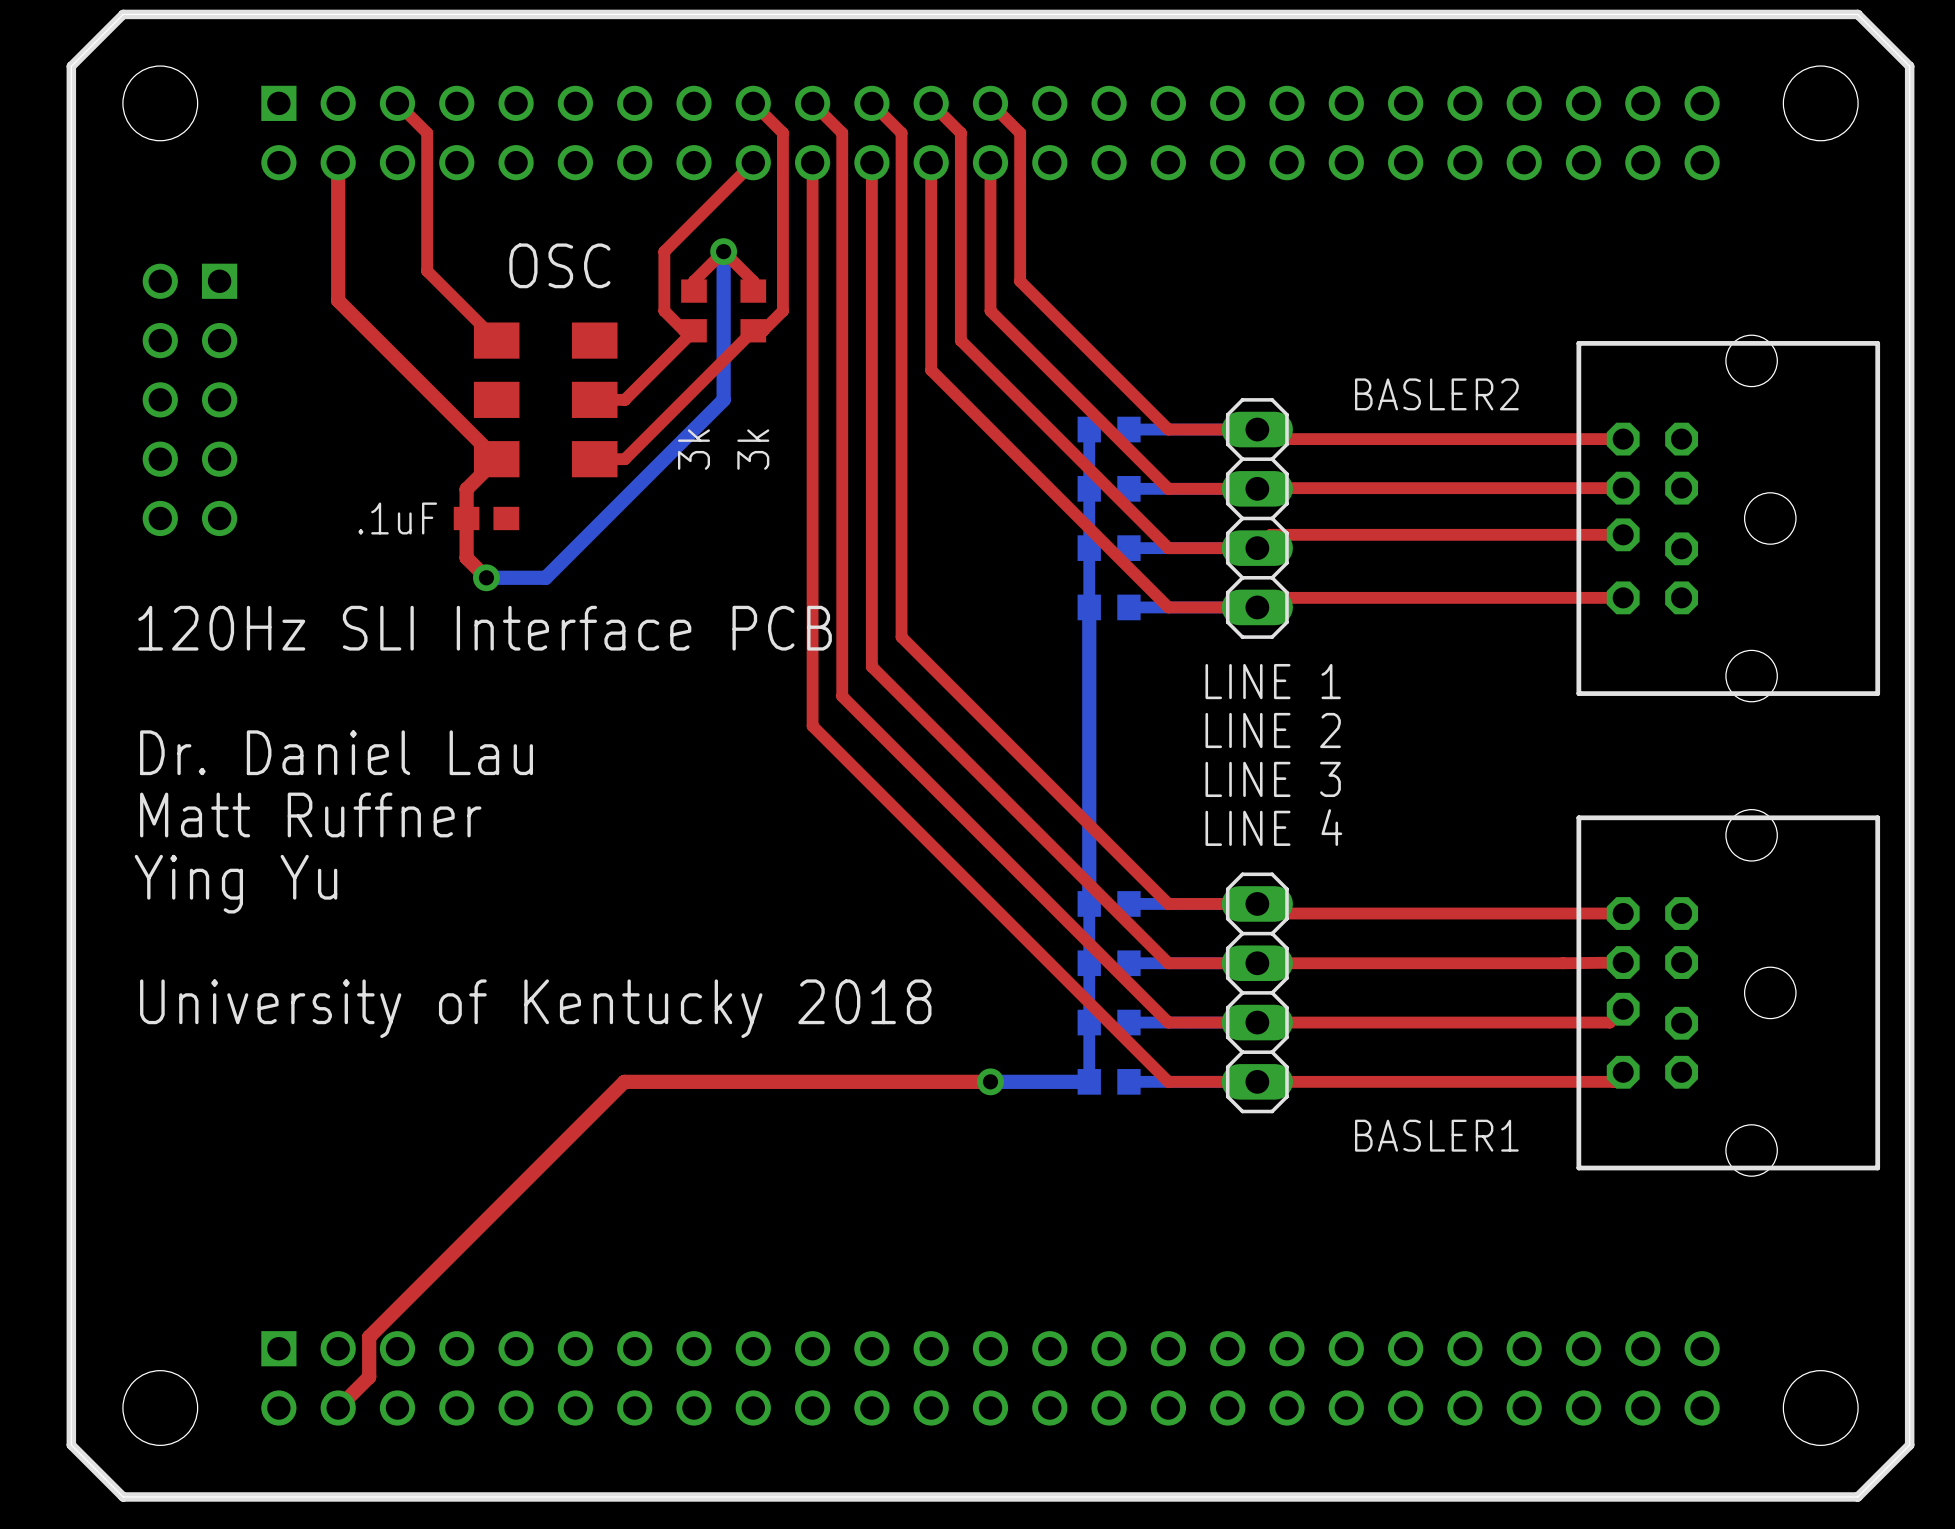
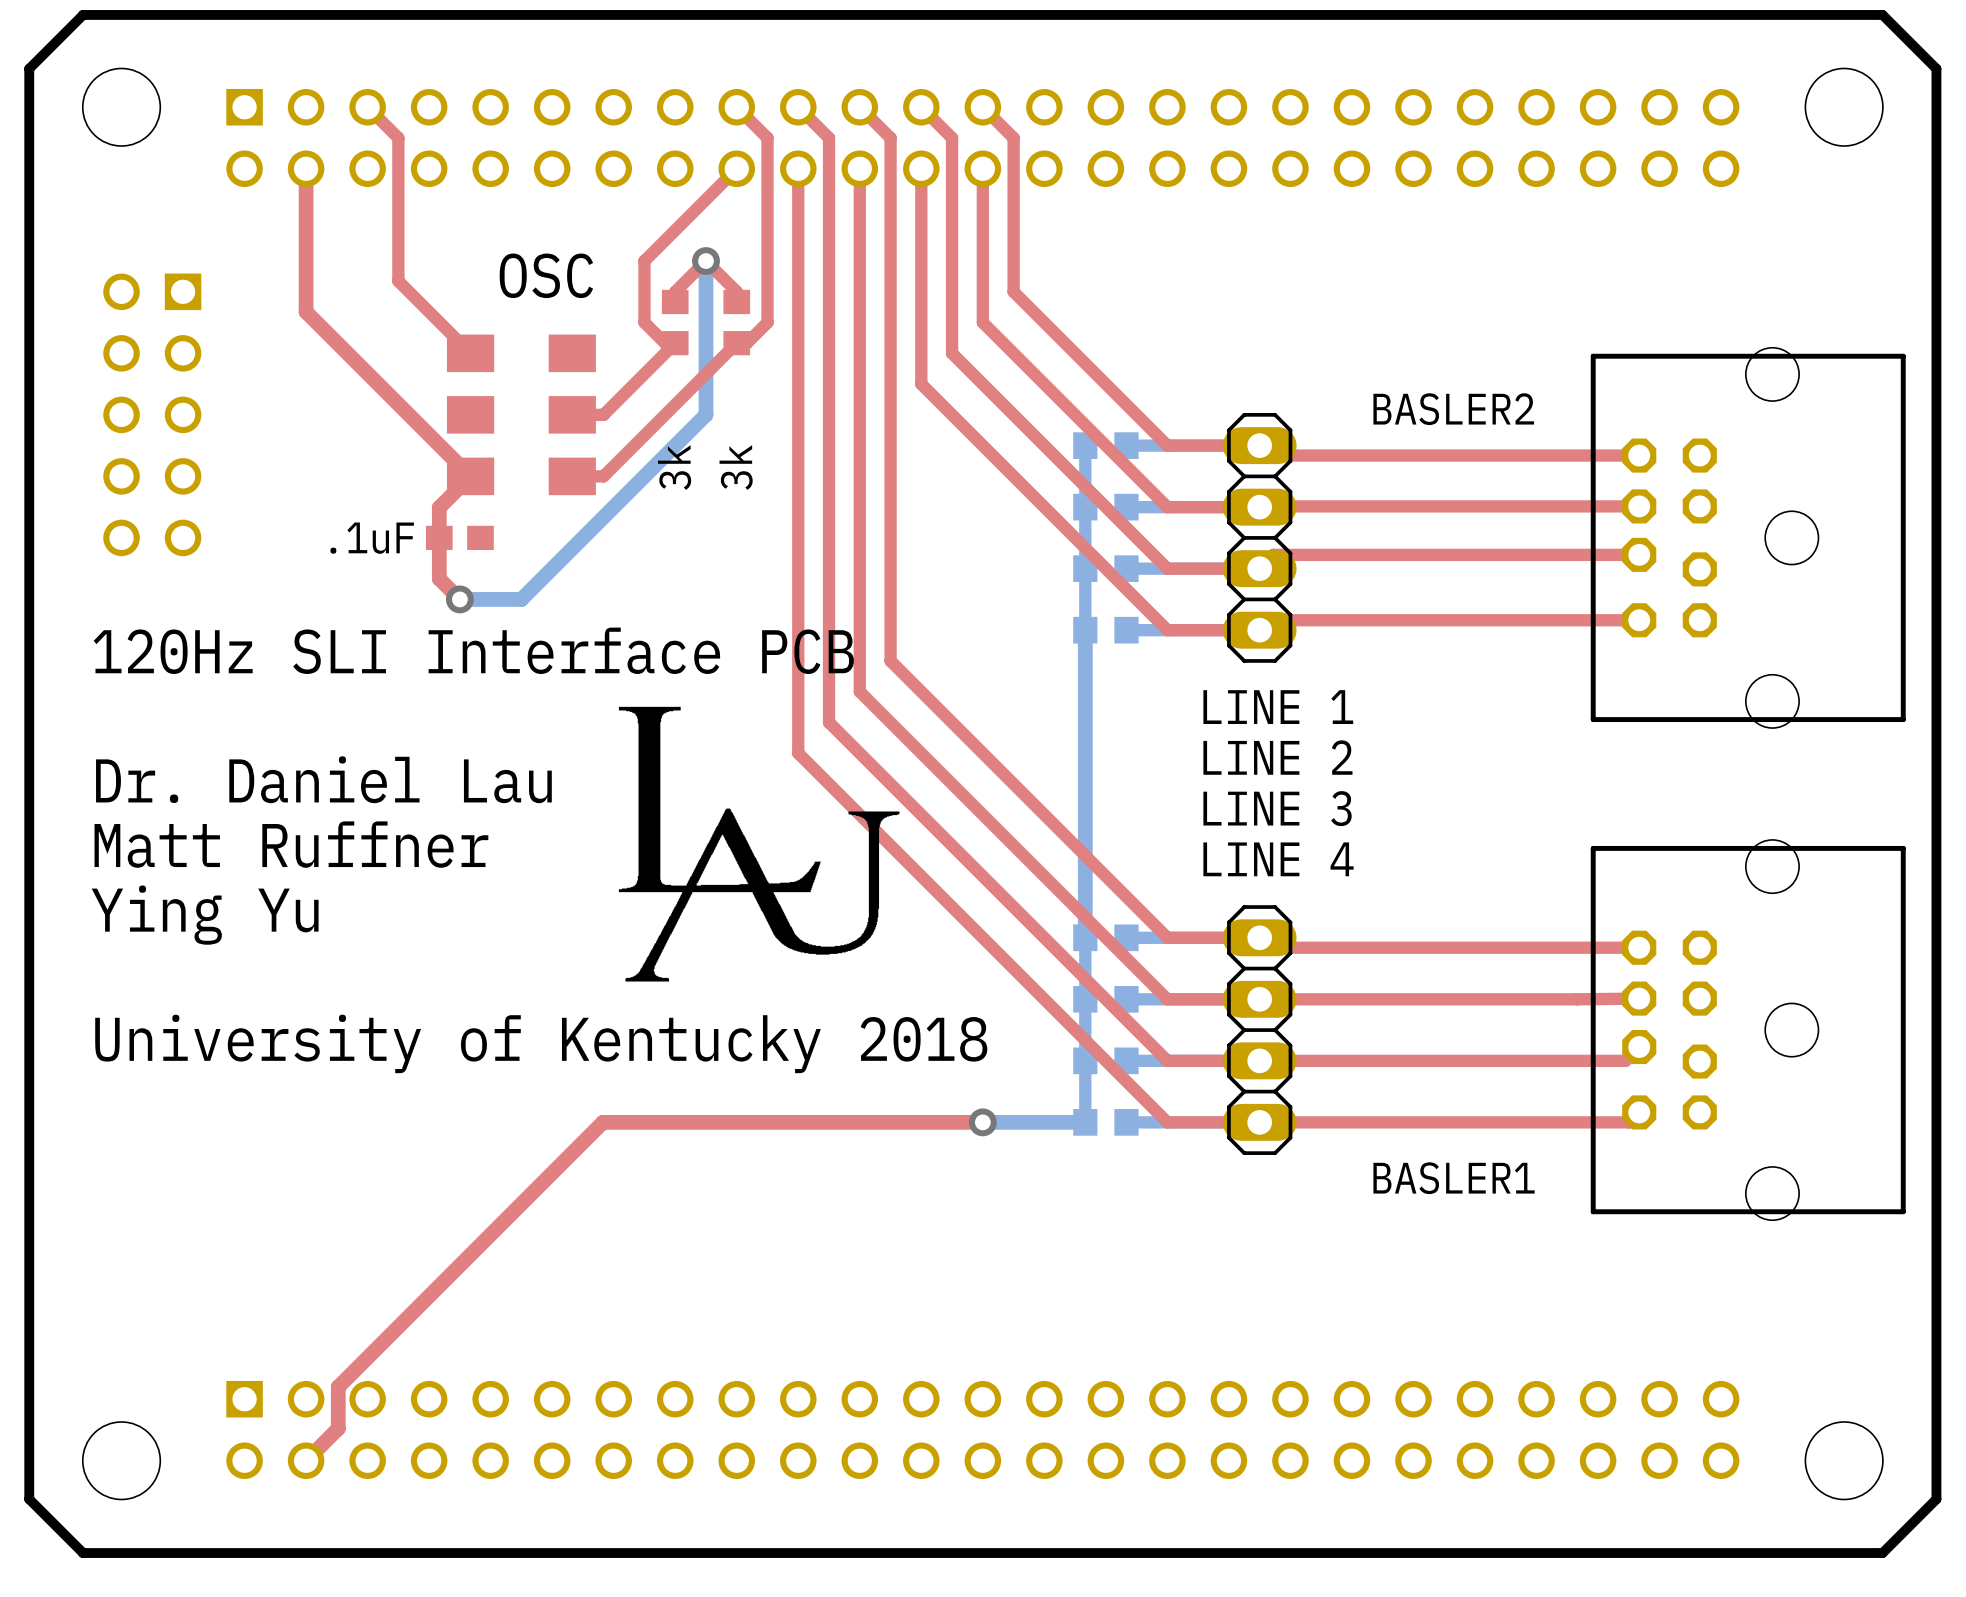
drawing: none -> [618, 706, 900, 982]

